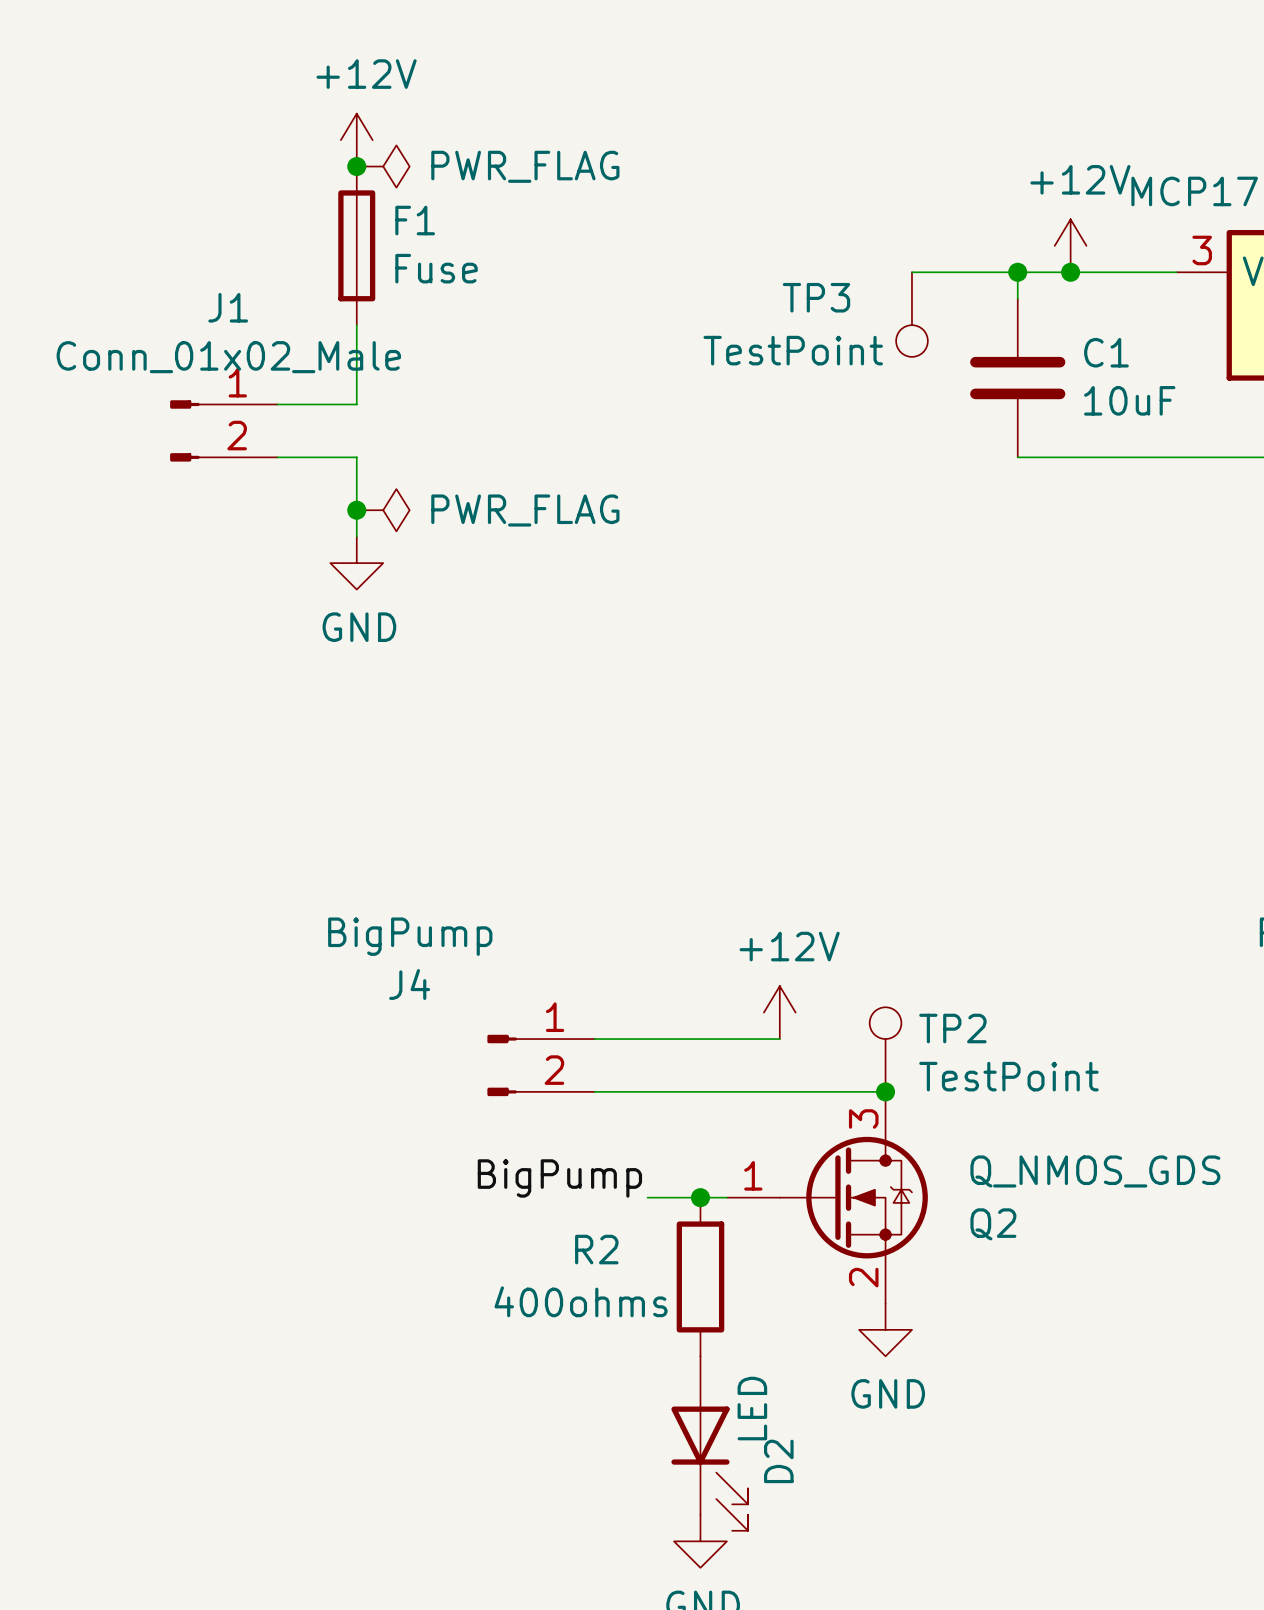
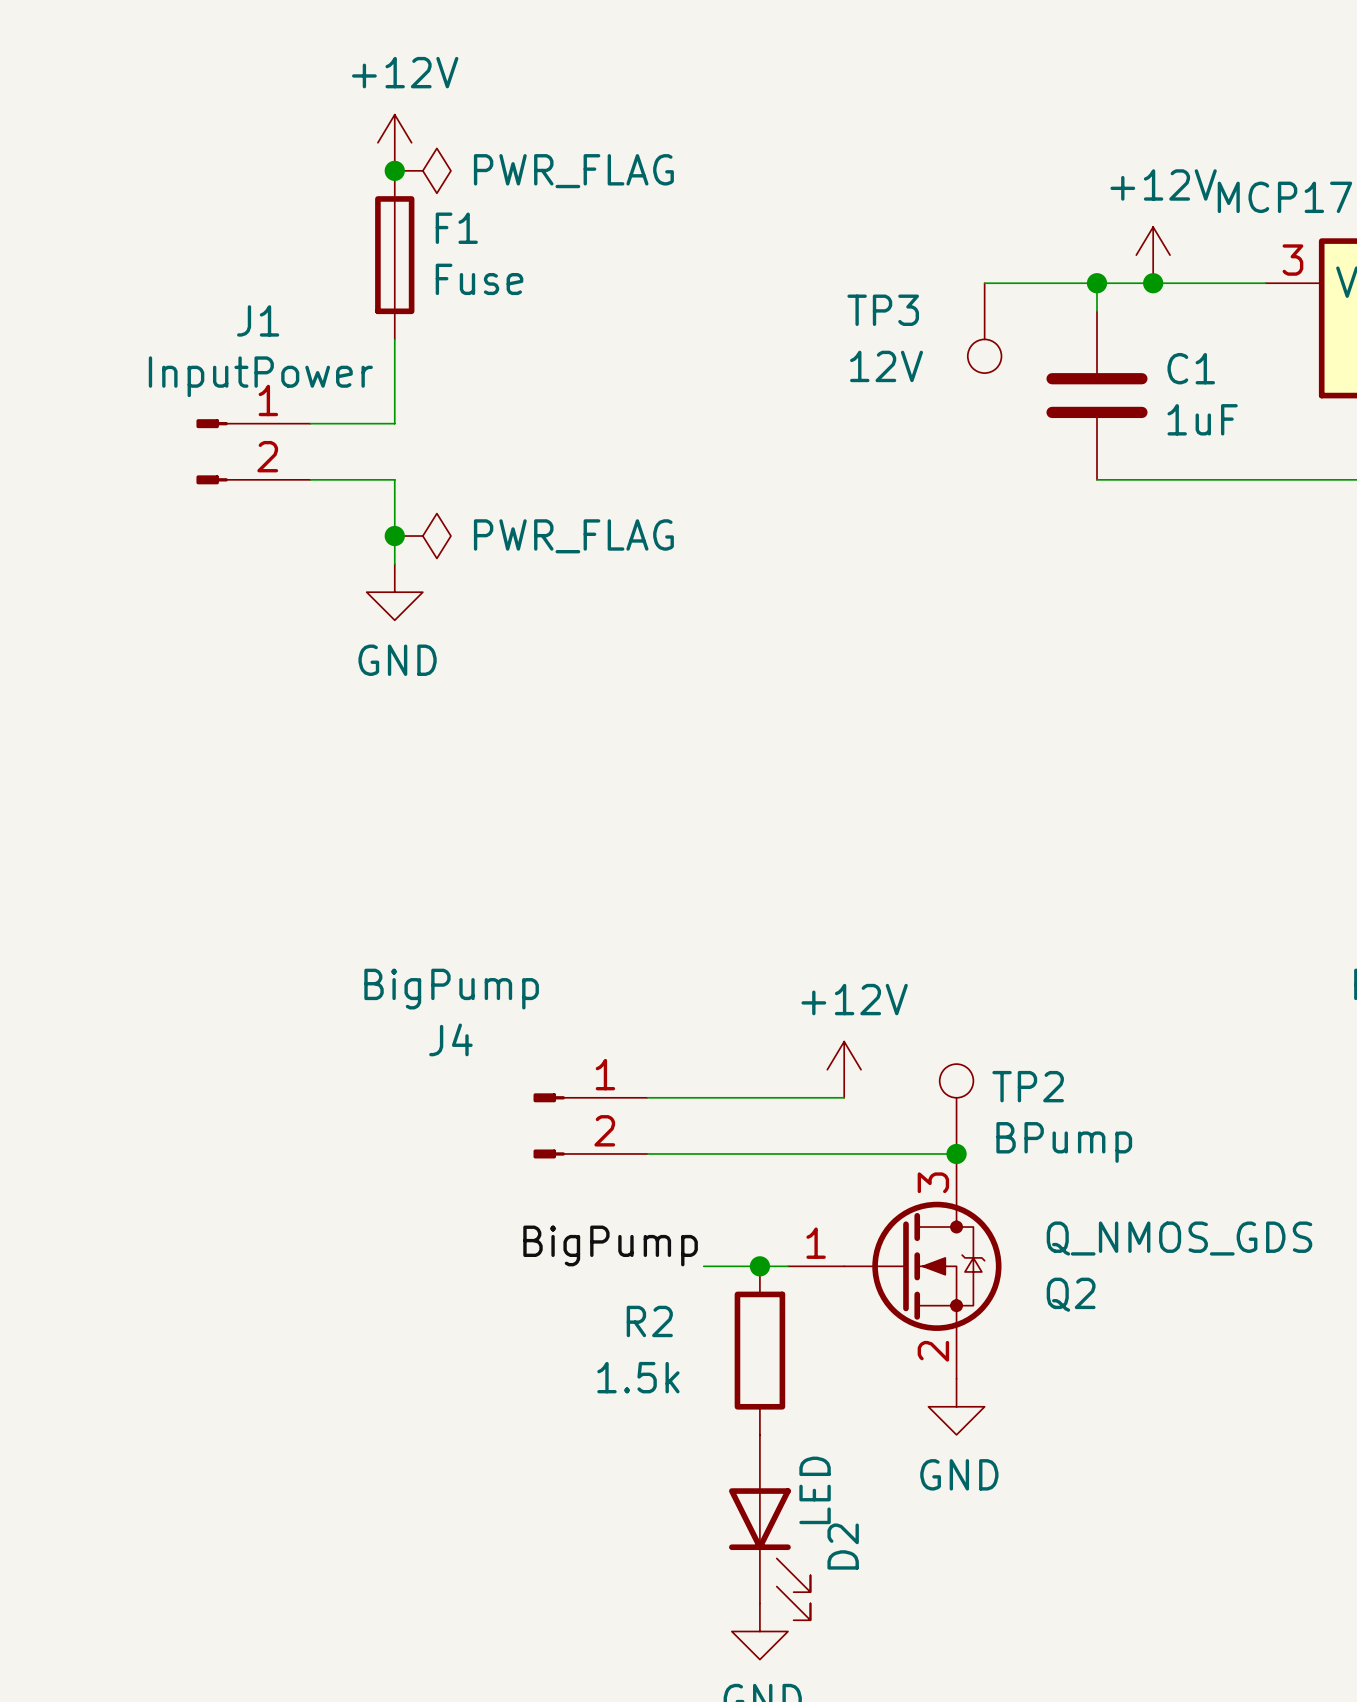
TP3 value: TestPoint (793, 350) -> 12V (886, 366)
J1 value: Conn_01x02_Male (228, 357) -> InputPower (260, 376)
C1 value: 10uF (1129, 400) -> 1uF (1202, 419)
TP2 value: TestPoint (1008, 1076) -> BPump (1064, 1142)
R2 value: 400ohms (581, 1301) -> 1.5k (638, 1377)

